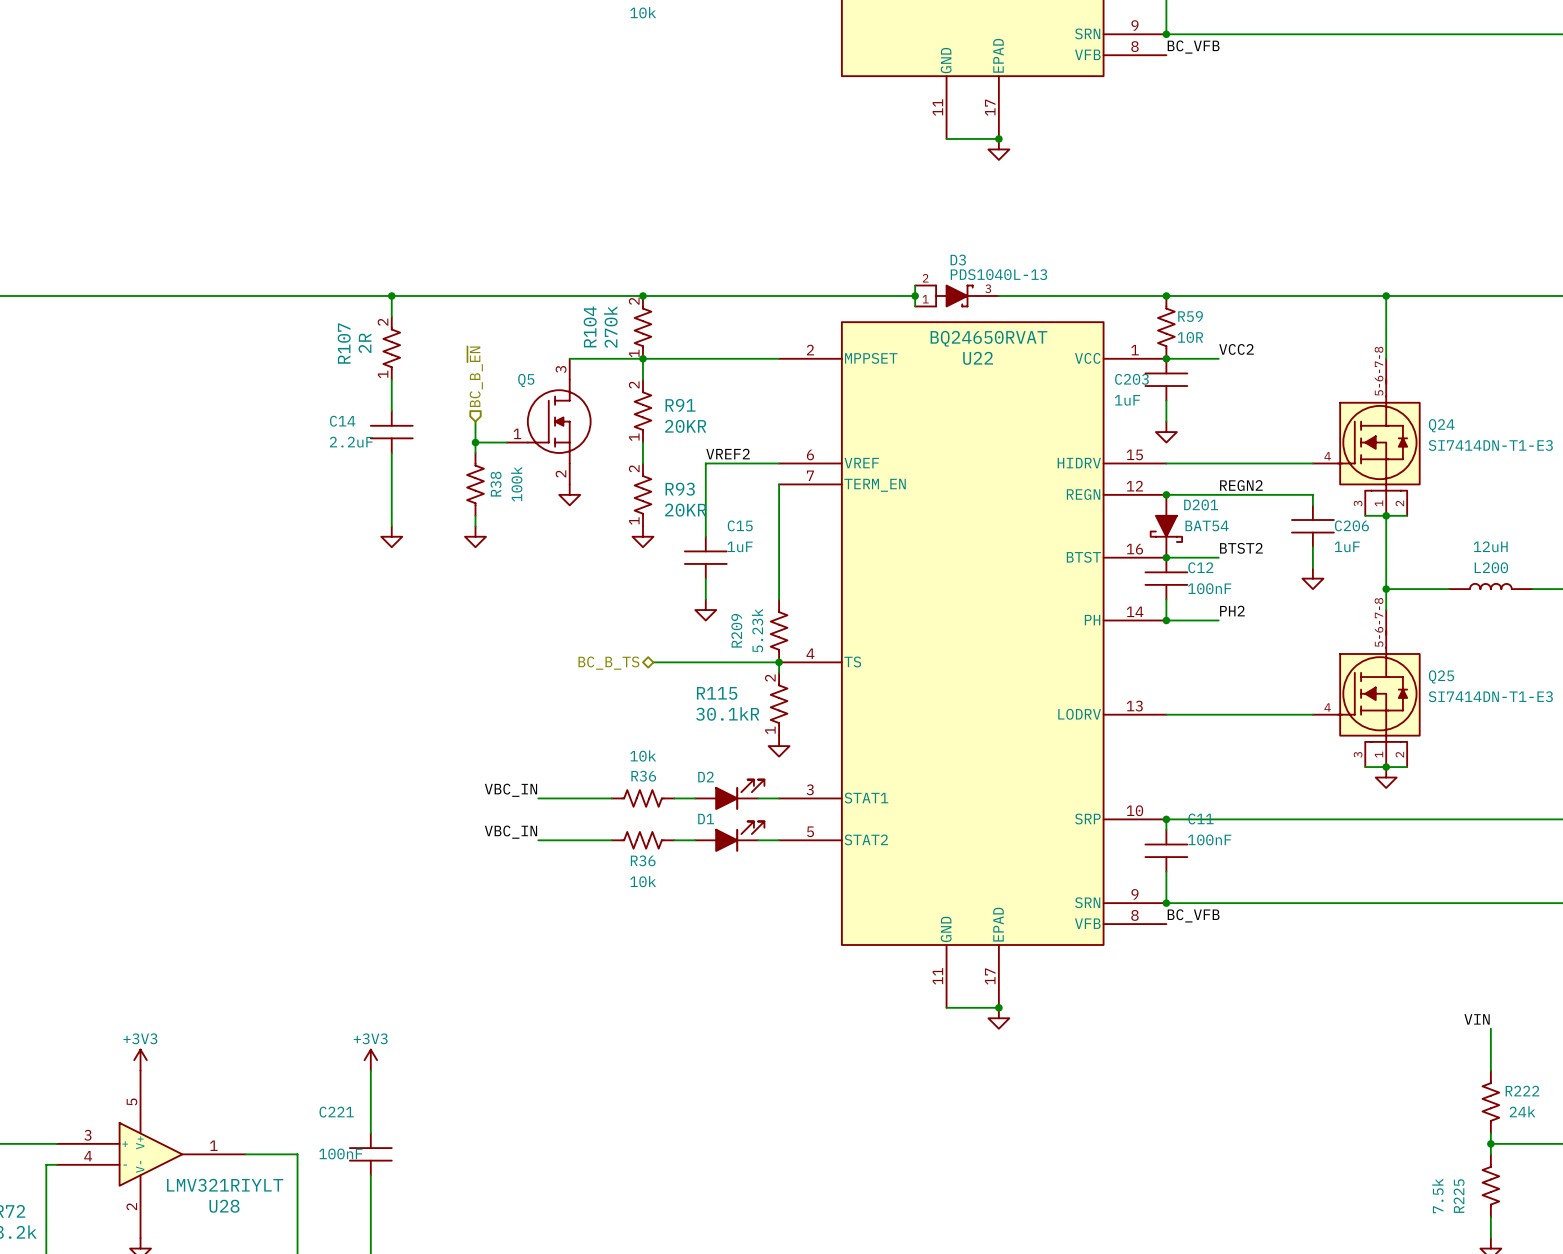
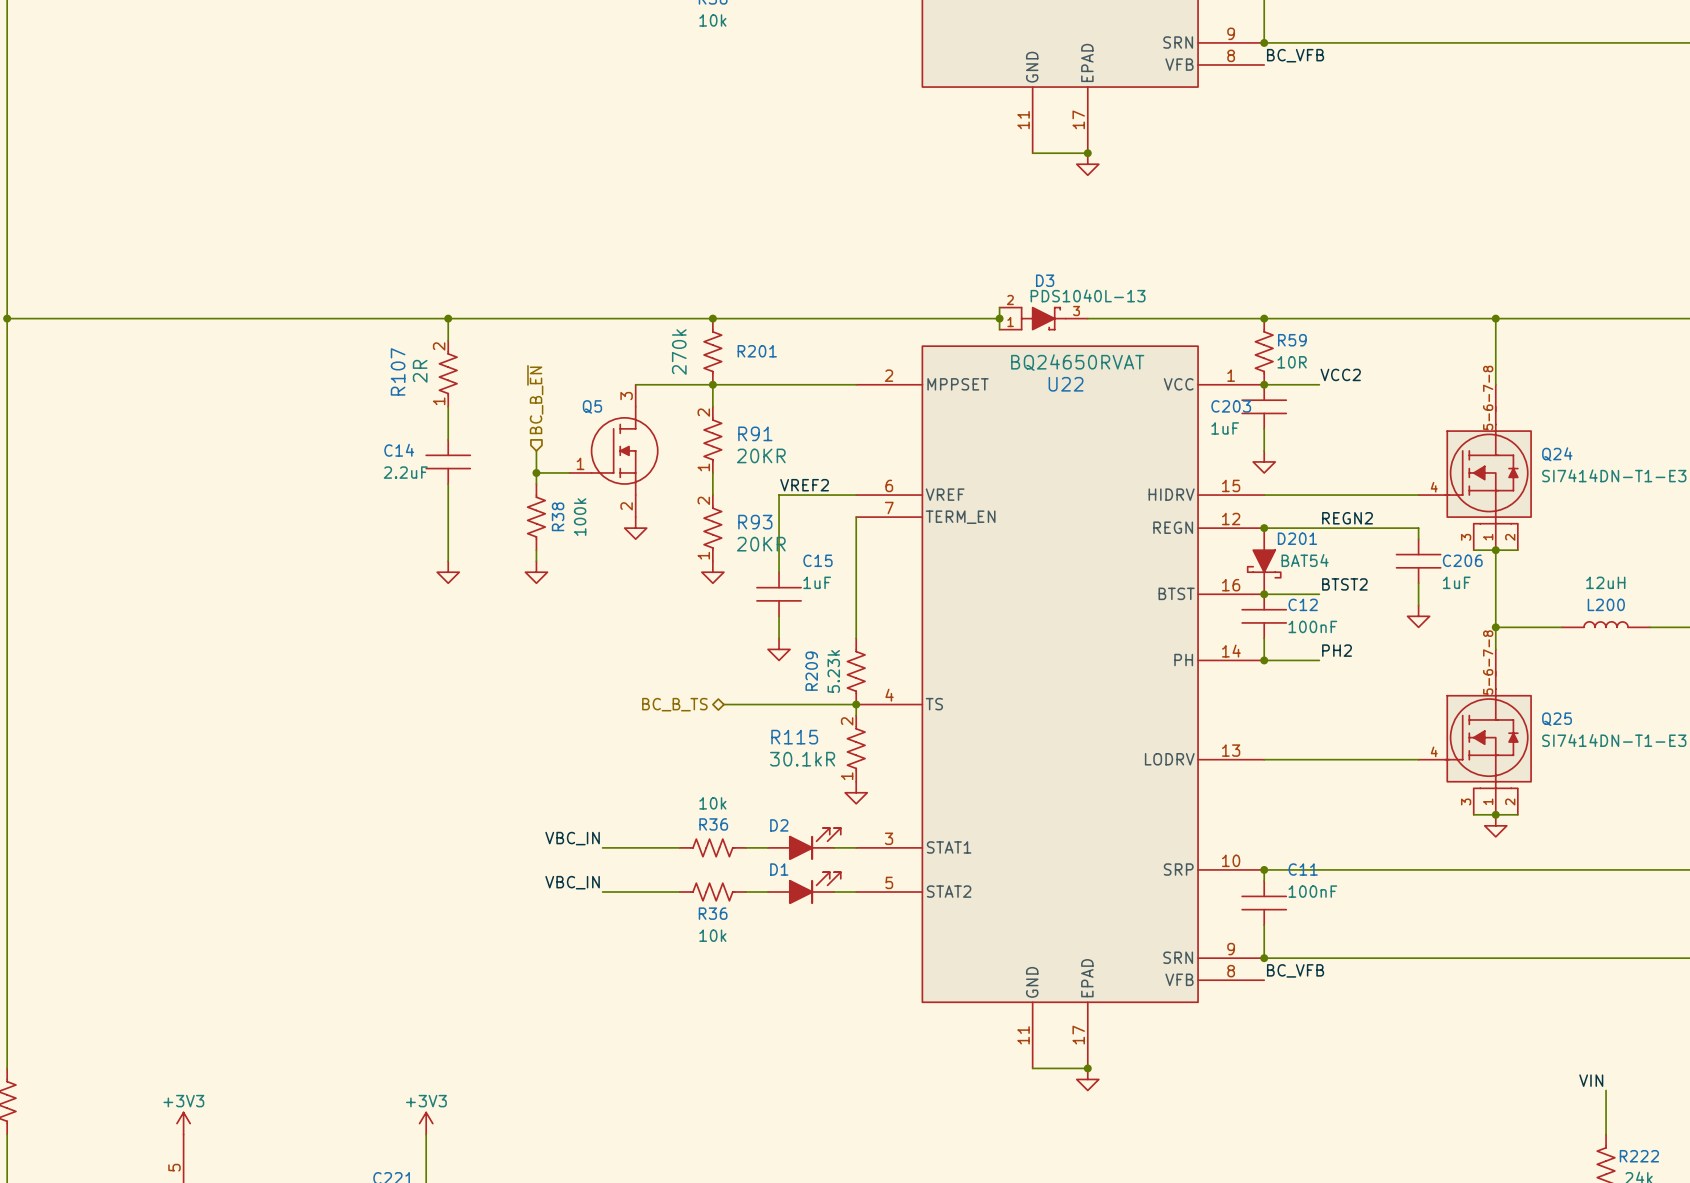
R104 pin number: 2 (634, 301) -> none
R104 name: R104 (590, 326) -> R201 (757, 351)
R104 pin number: 1 (634, 353) -> none

